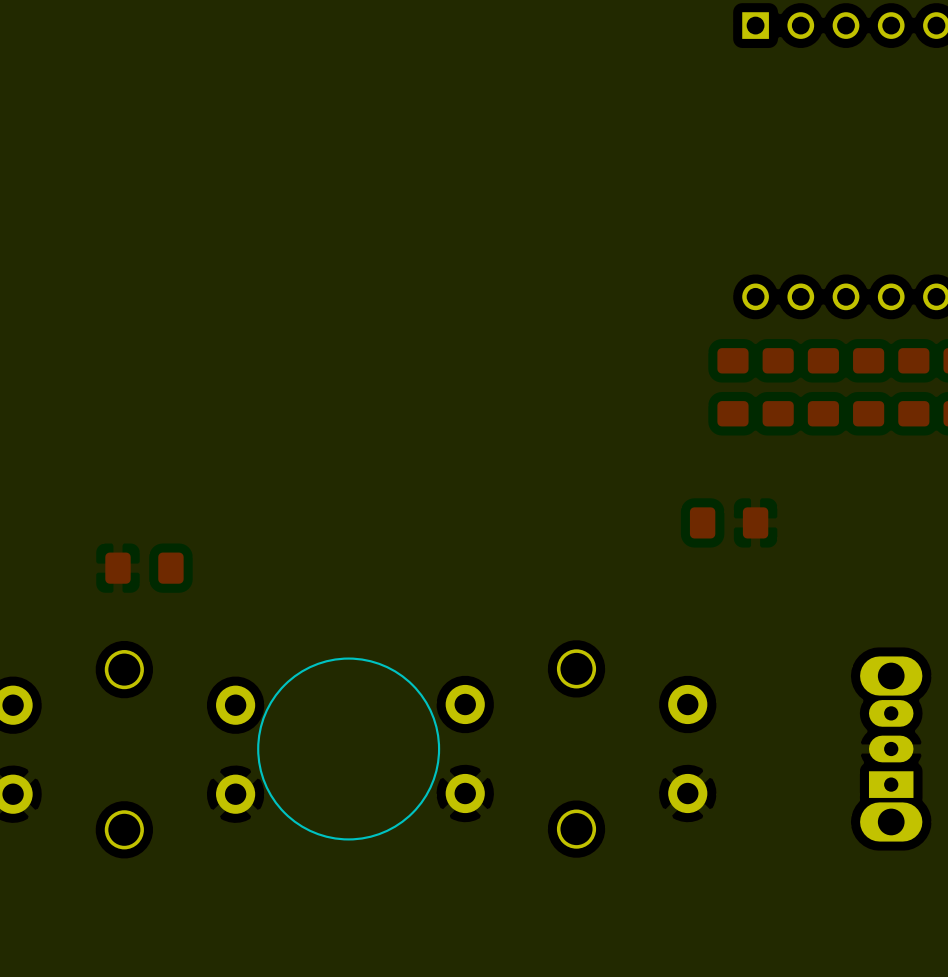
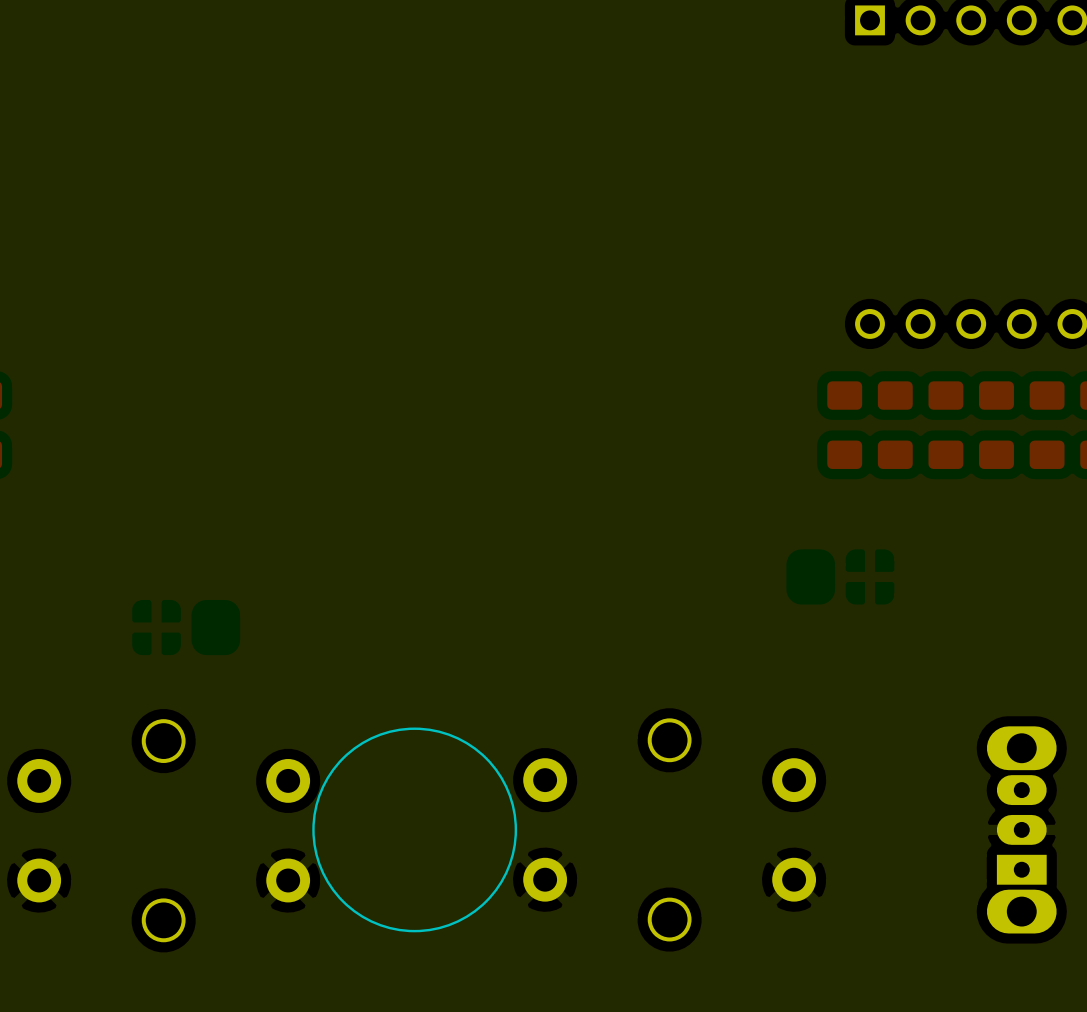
part: (729, 522) -> none
part: (144, 568) -> none

